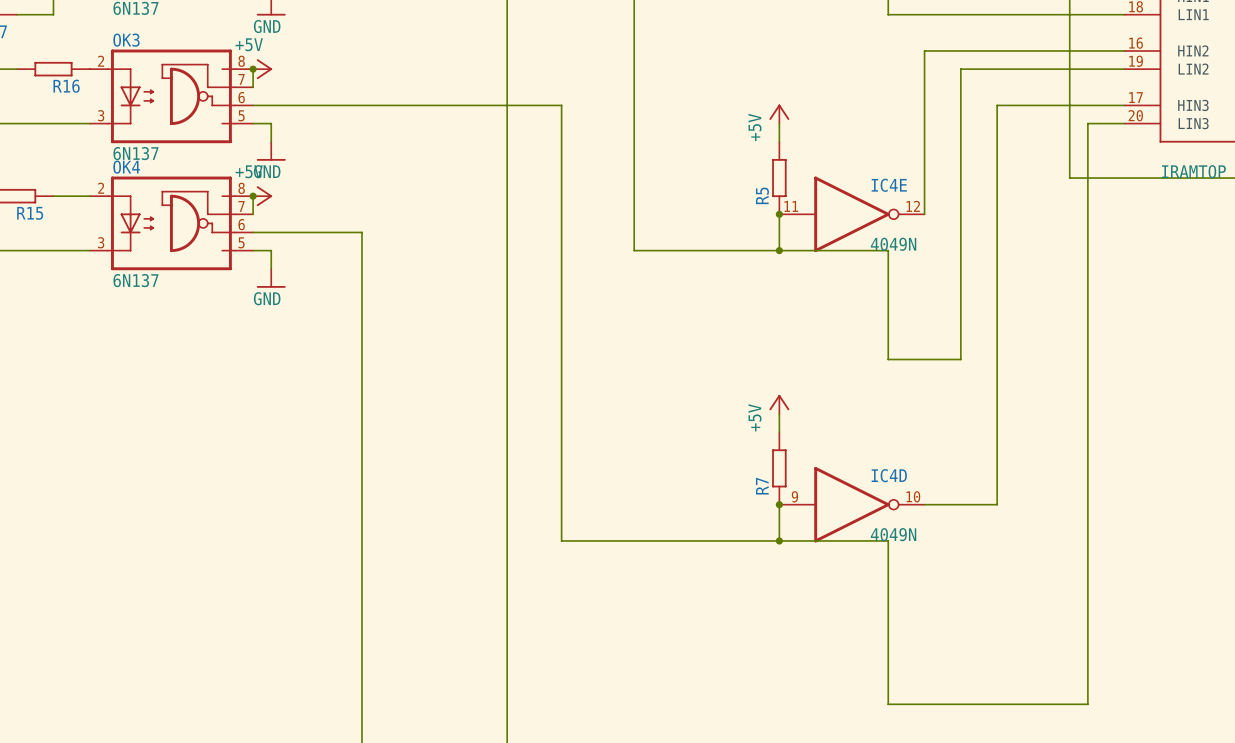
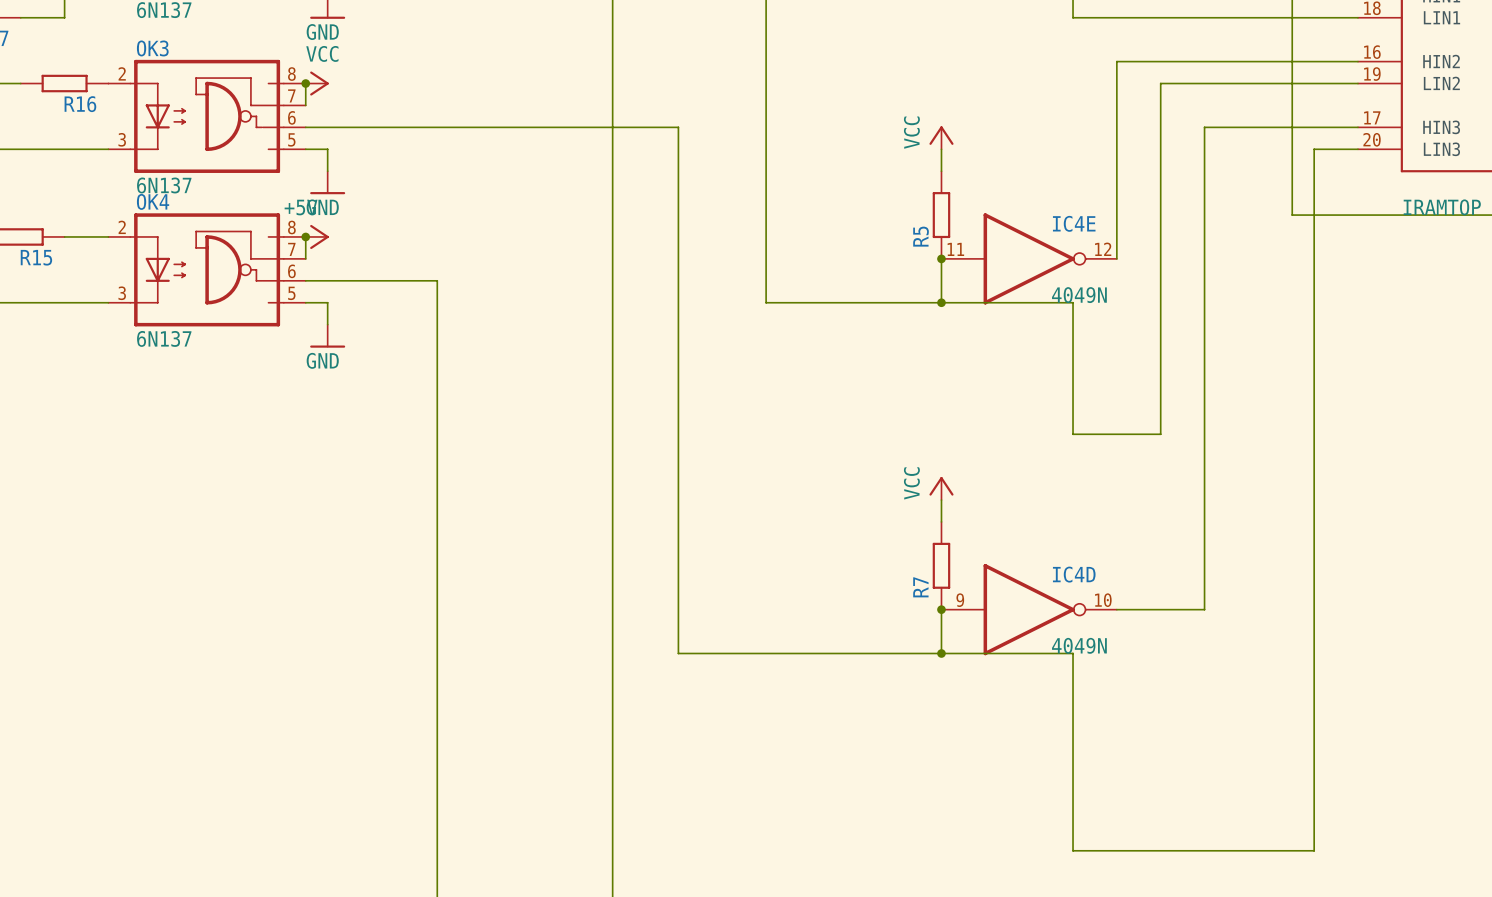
power symbol: +5V (262, 69) -> VCC (317, 83)
power symbol: +5V (779, 114) -> VCC (941, 137)
power symbol: +5V (779, 404) -> VCC (941, 488)

